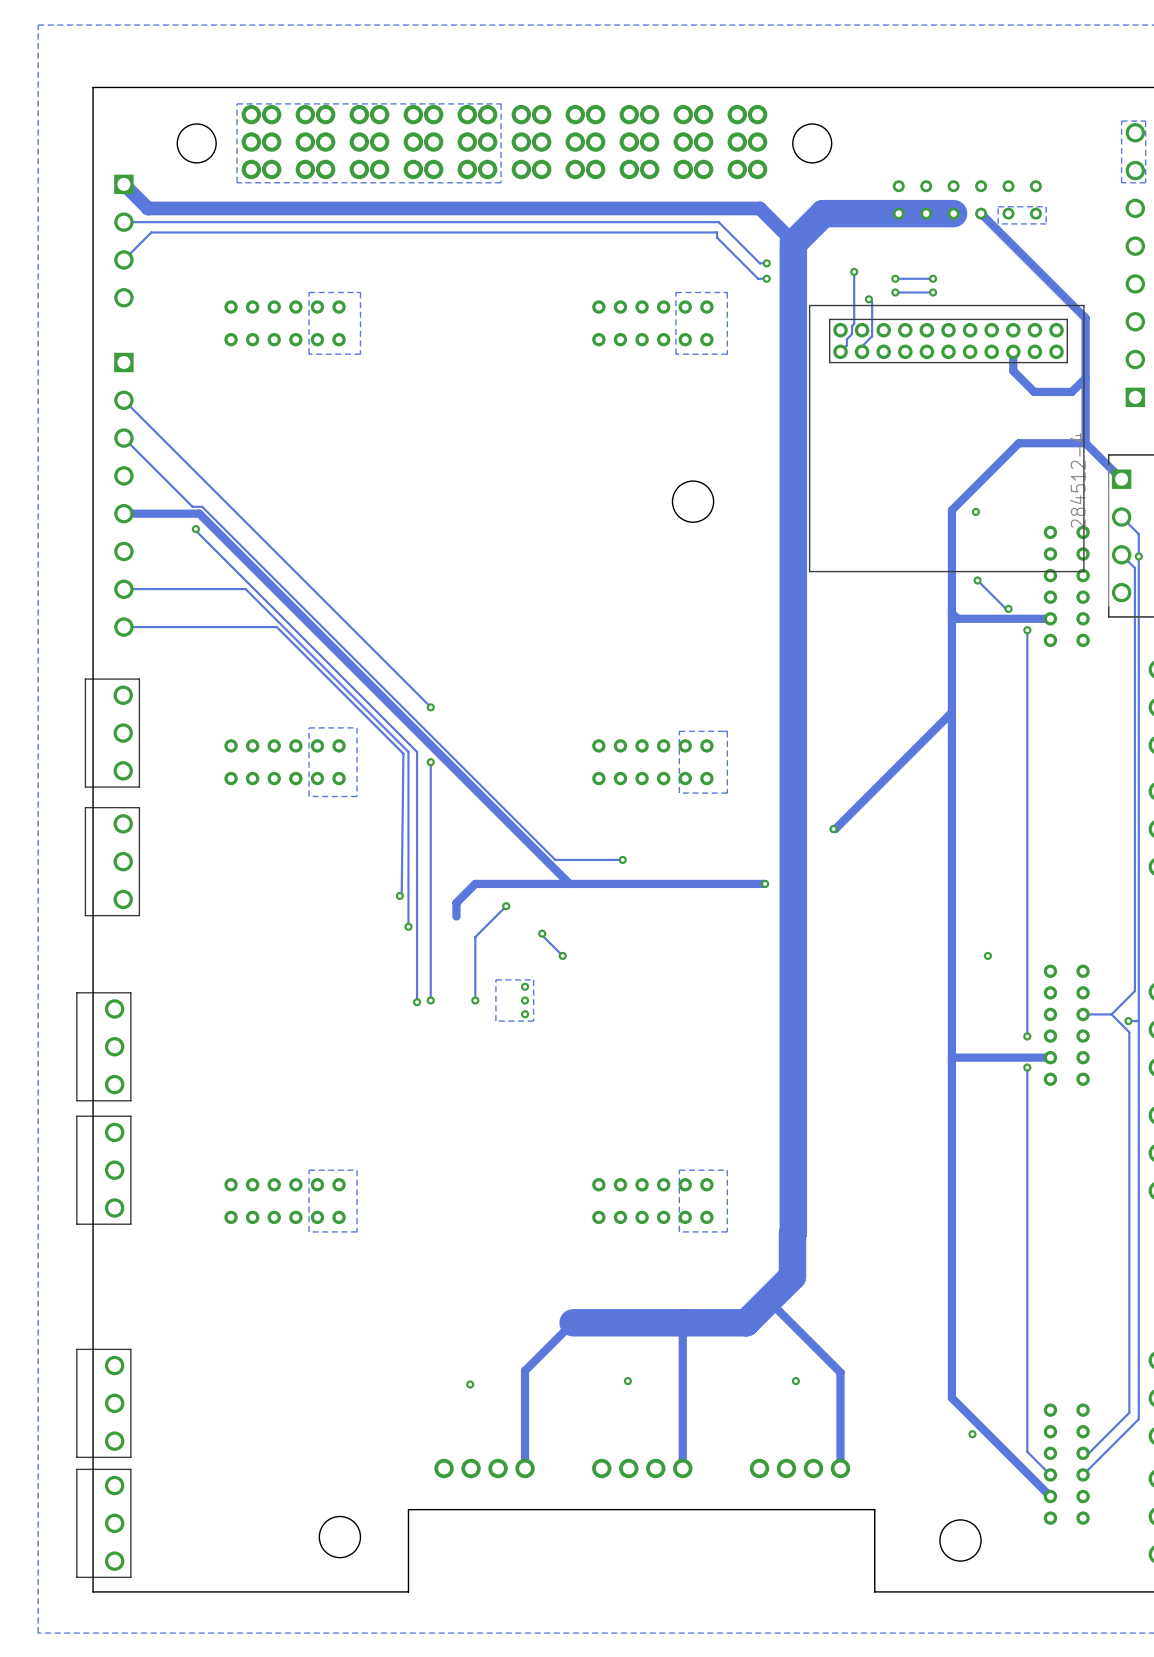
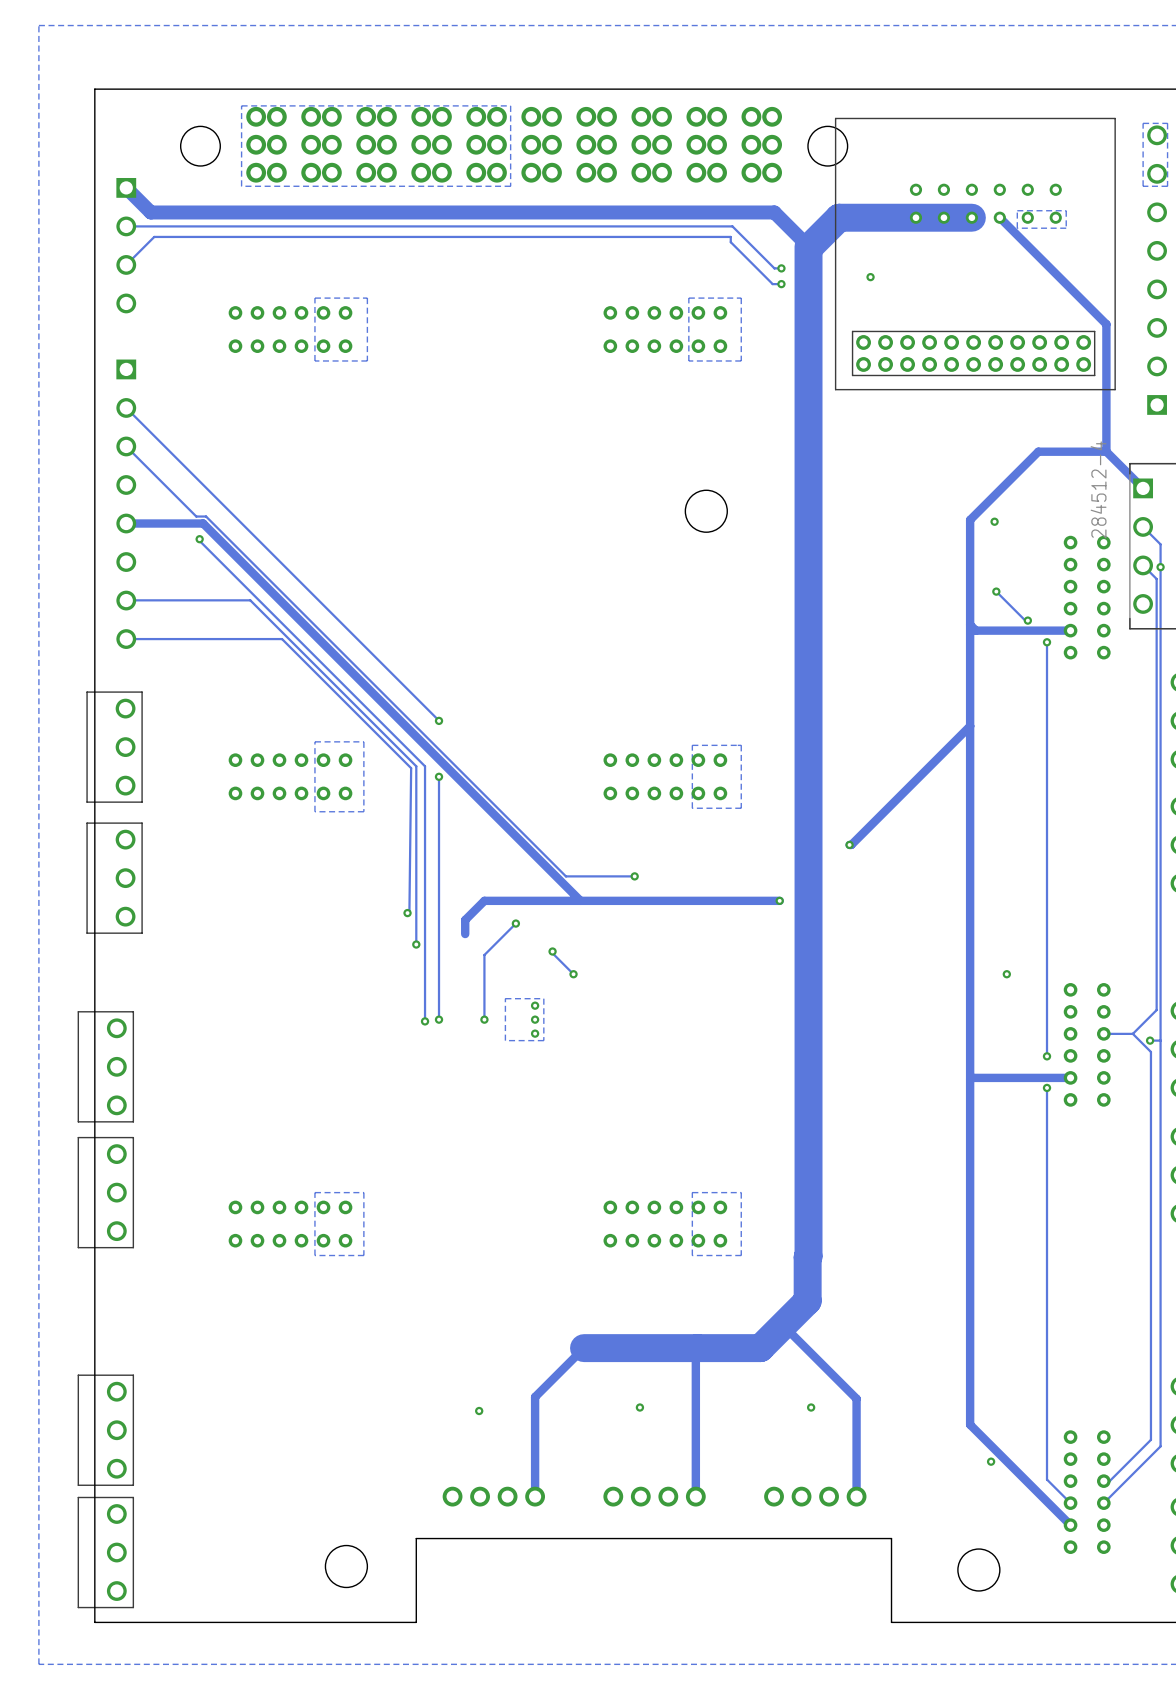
track: (854, 271) (854, 323) (852, 326) (852, 334) (847, 339) (847, 345) (840, 351) -> none
via: (895, 278) -> none
track: (933, 278) (895, 278) -> none
via: (933, 278) -> none
via: (895, 292) -> none
track: (933, 292) (895, 292) -> none
via: (933, 292) -> none
track: (868, 299) (872, 302) (872, 336) (862, 346) (862, 351) -> none
via: (868, 299) -> none
track: (1013, 351) (1013, 371) (1034, 391) (1071, 391) (1085, 378) -> none
part rotation: 0° (946, 438) -> 180° (975, 254)
part position: (946, 438) -> (975, 254)

